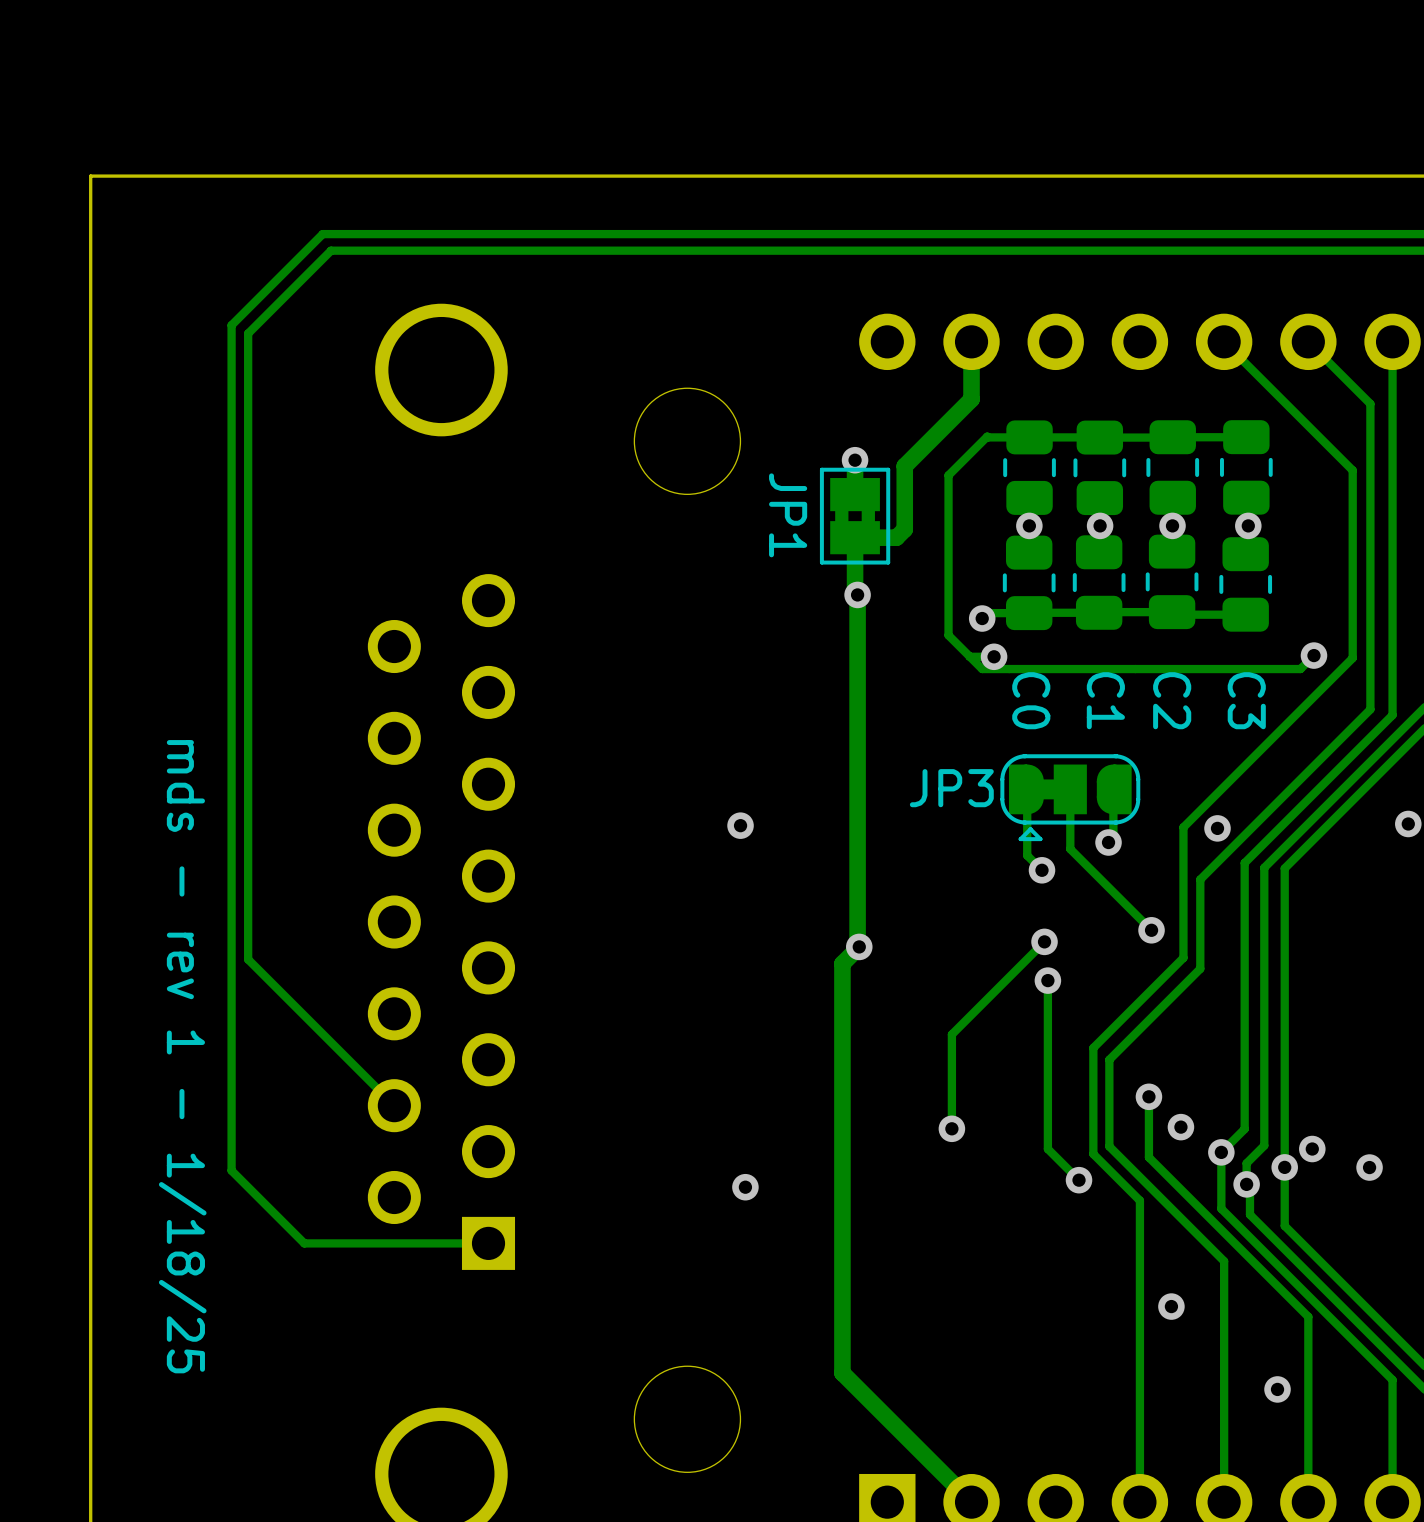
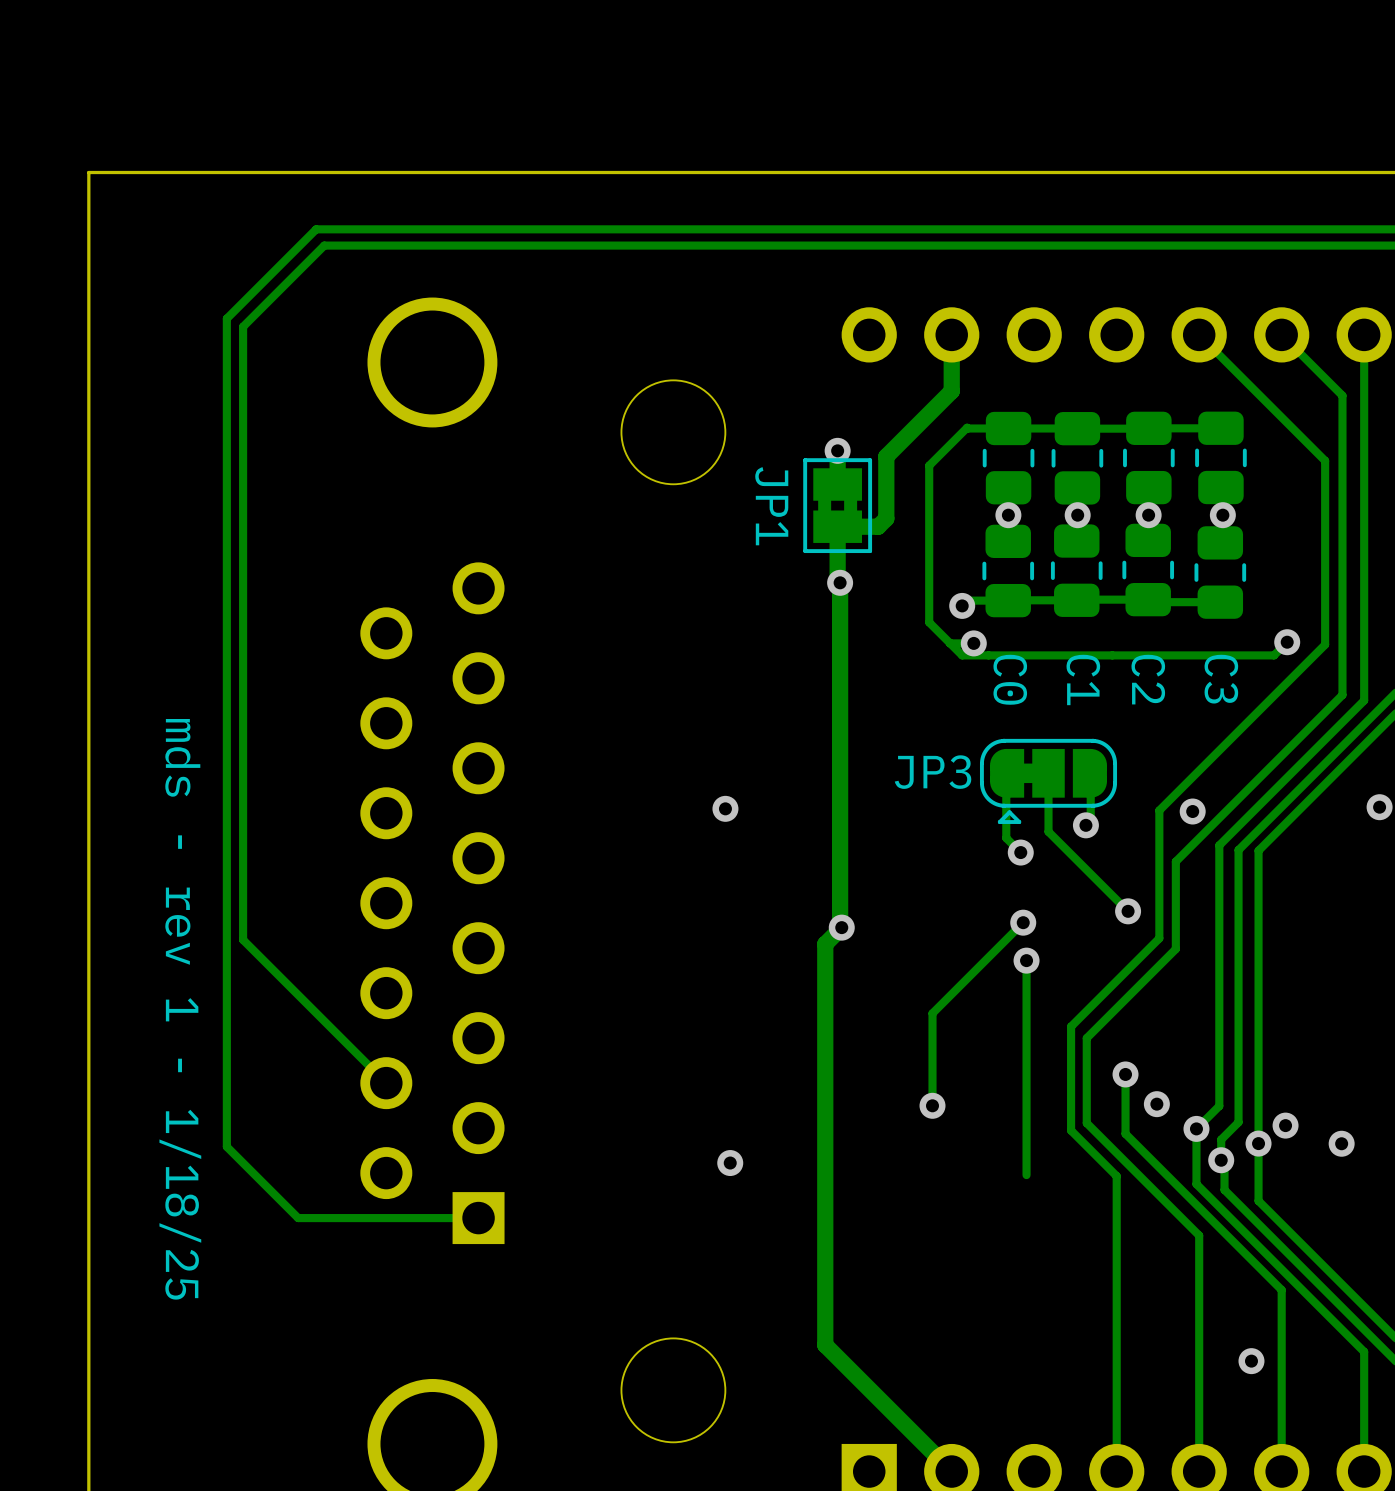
JP3 footprint: [1000, 754, 1141, 842] -> [979, 738, 1118, 824]
track: (1047, 1149) (1079, 1180) -> (1026, 1125) (1026, 1175)
via: (1079, 1180) -> none
via: (1171, 1306) -> none

